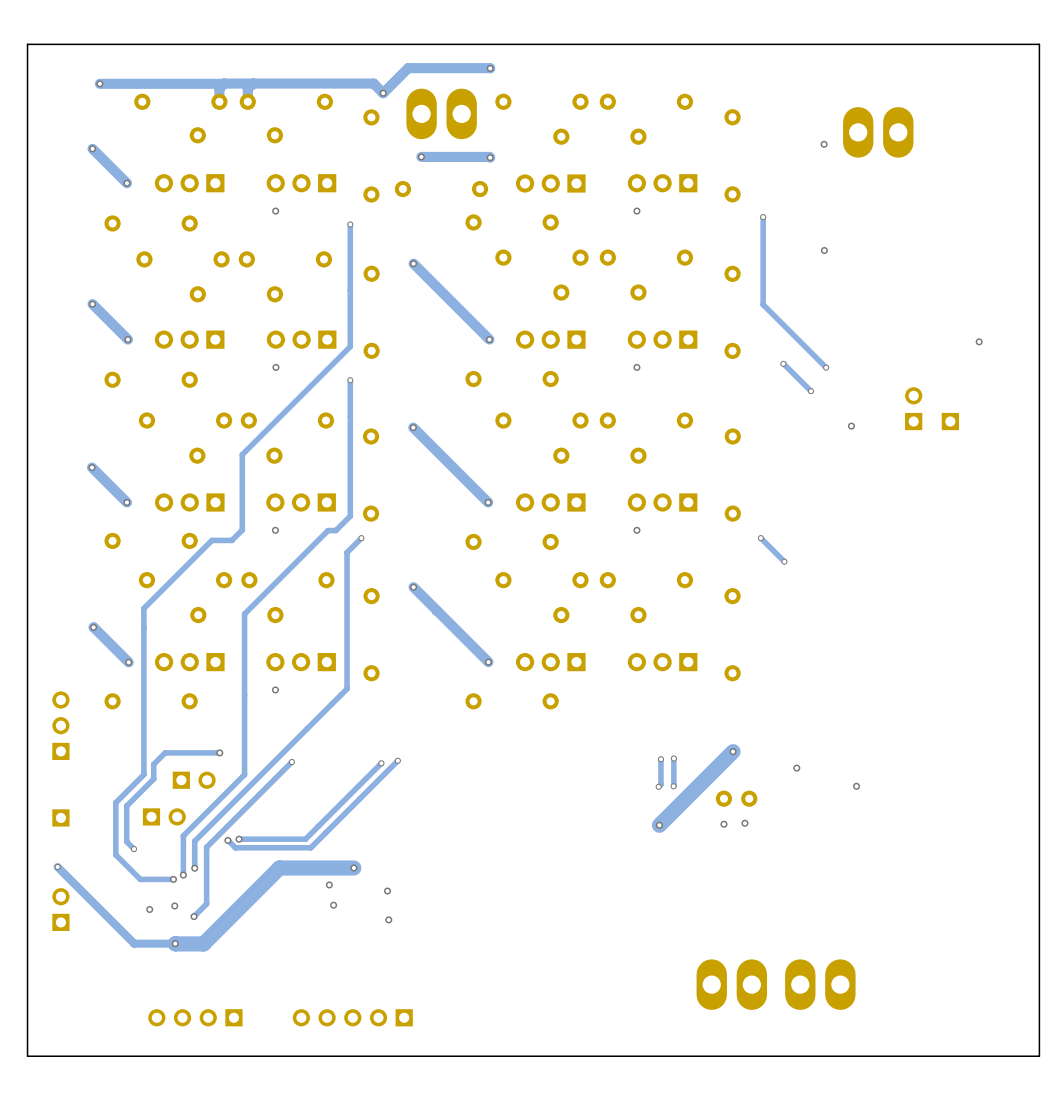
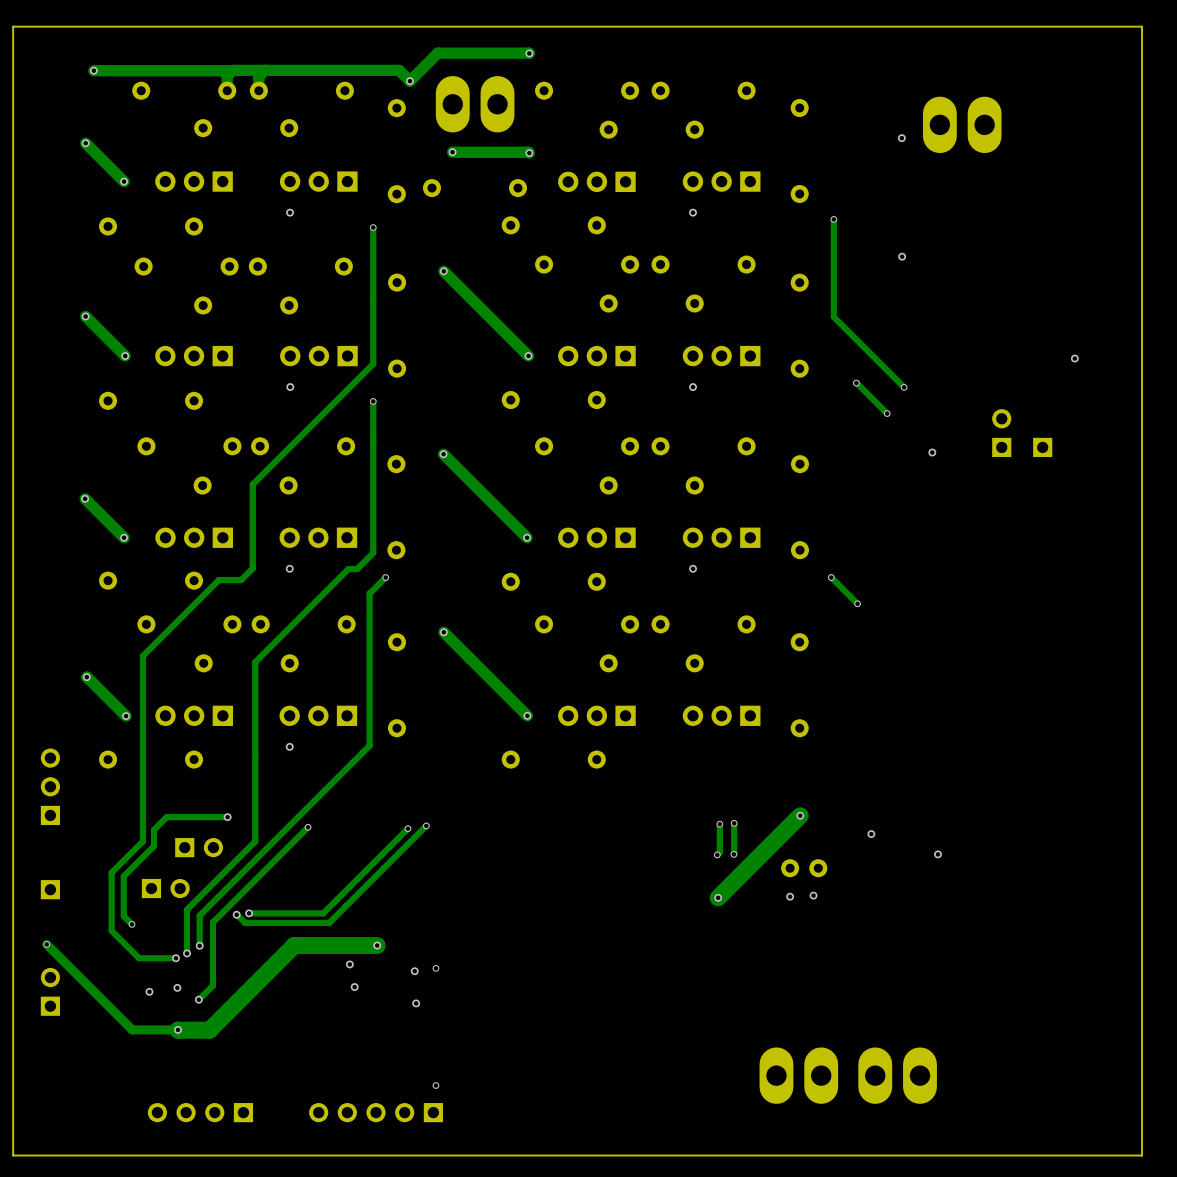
via: none -> (435, 968)
via: none -> (435, 1085)

